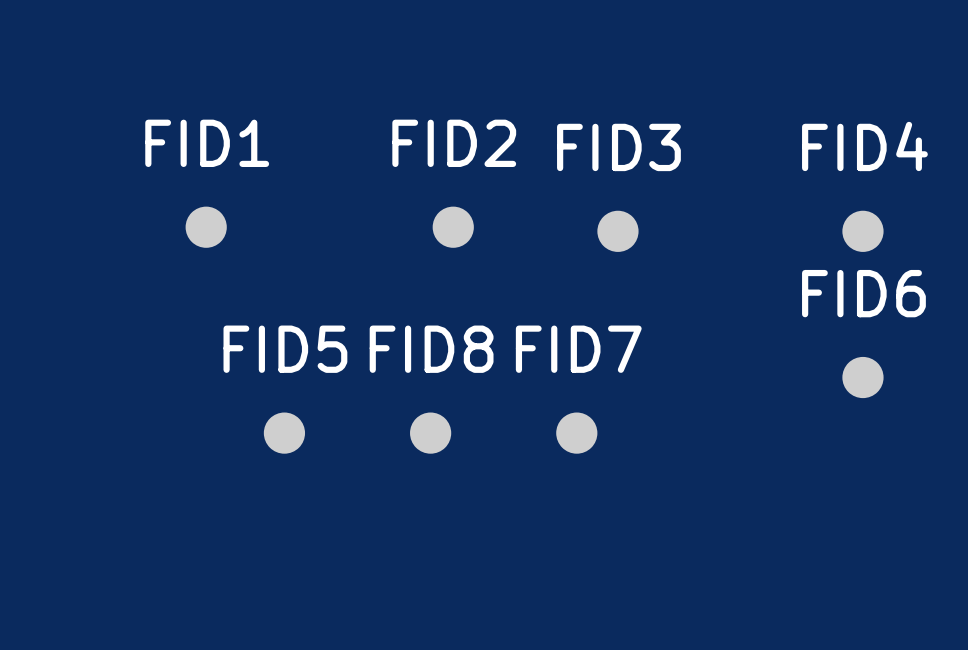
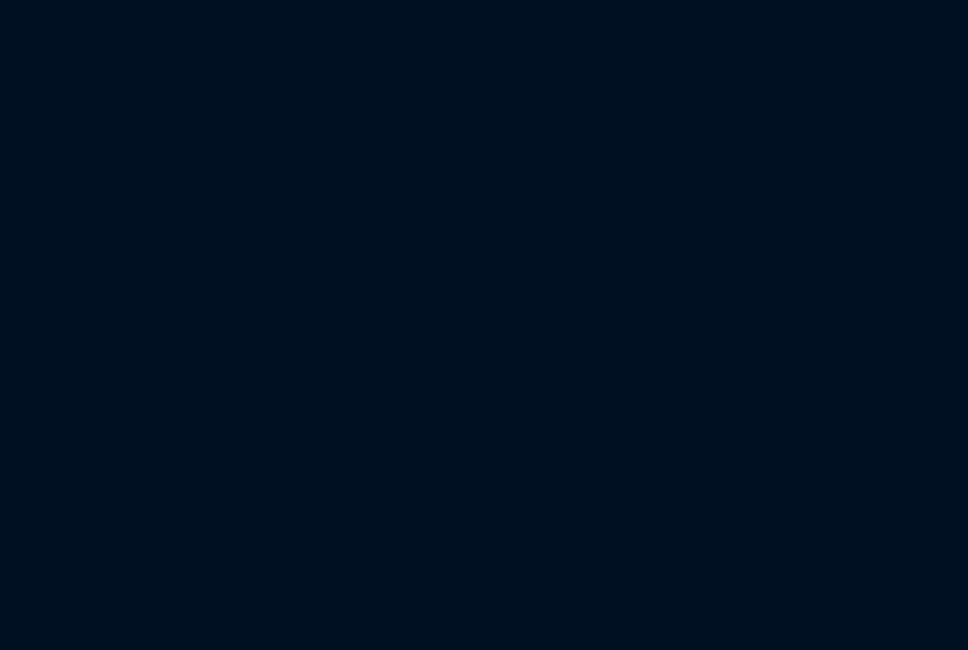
FID1: (206, 227) -> none
FID2: (453, 227) -> none
FID3: (617, 231) -> none
FID4: (862, 231) -> none
FID6: (862, 377) -> none
FID5: (284, 433) -> none
FID8: (430, 433) -> none
FID7: (576, 433) -> none

